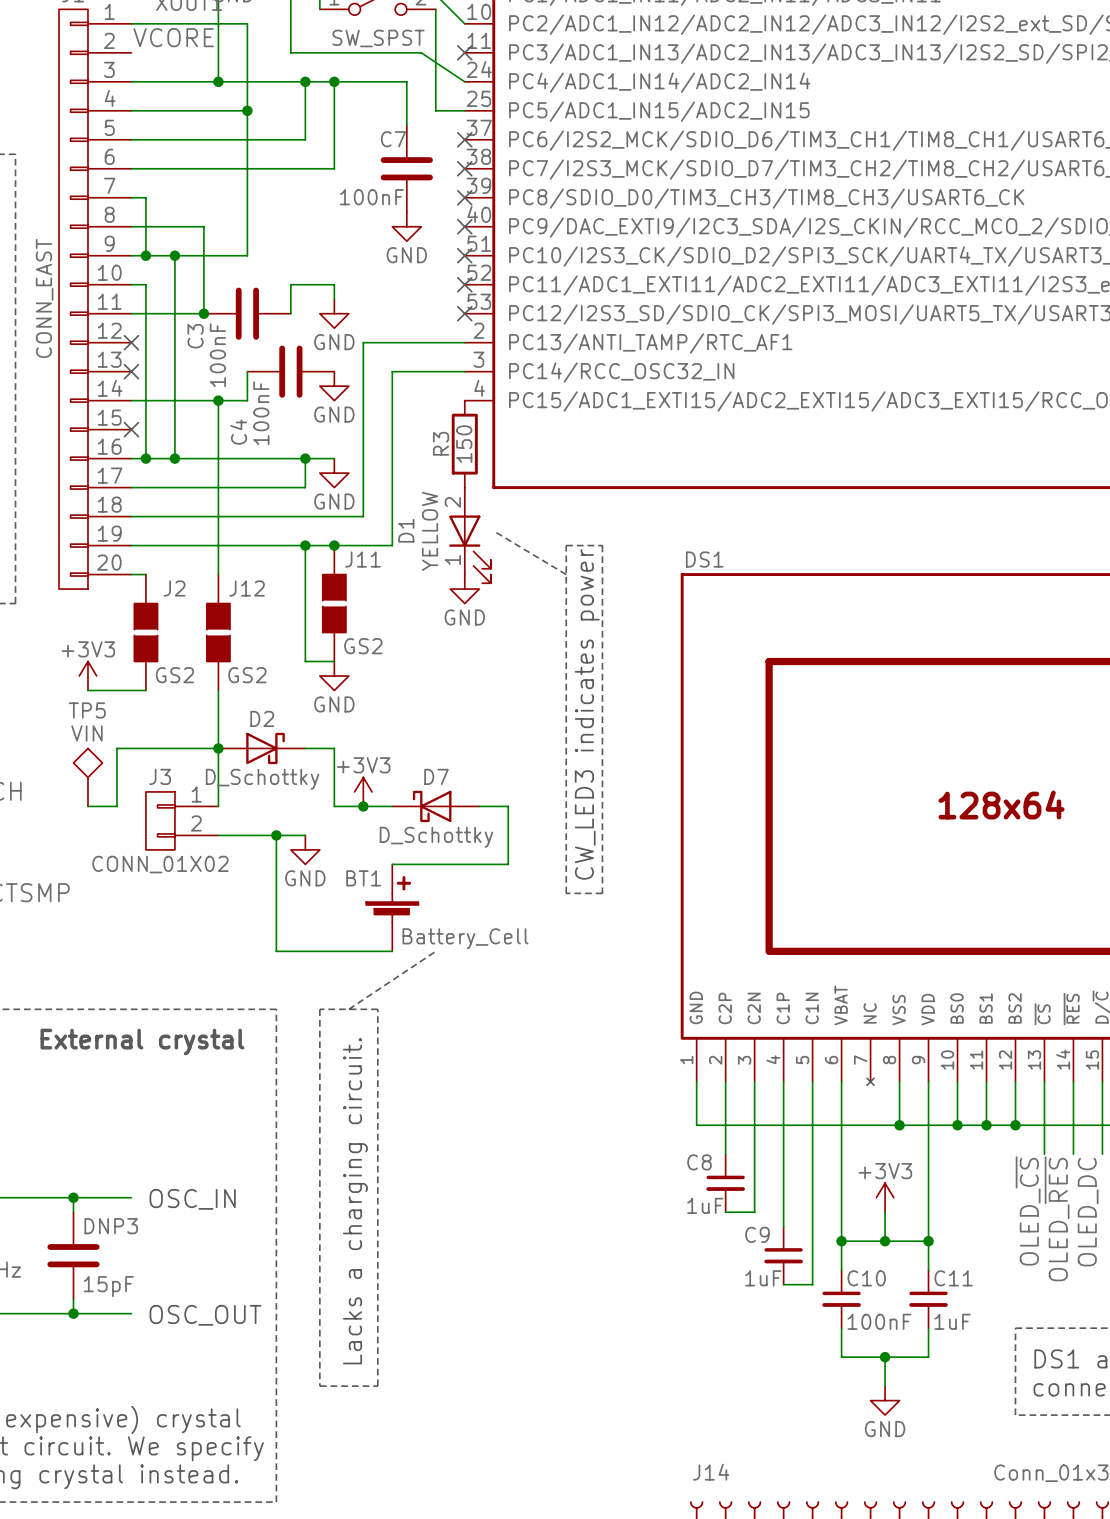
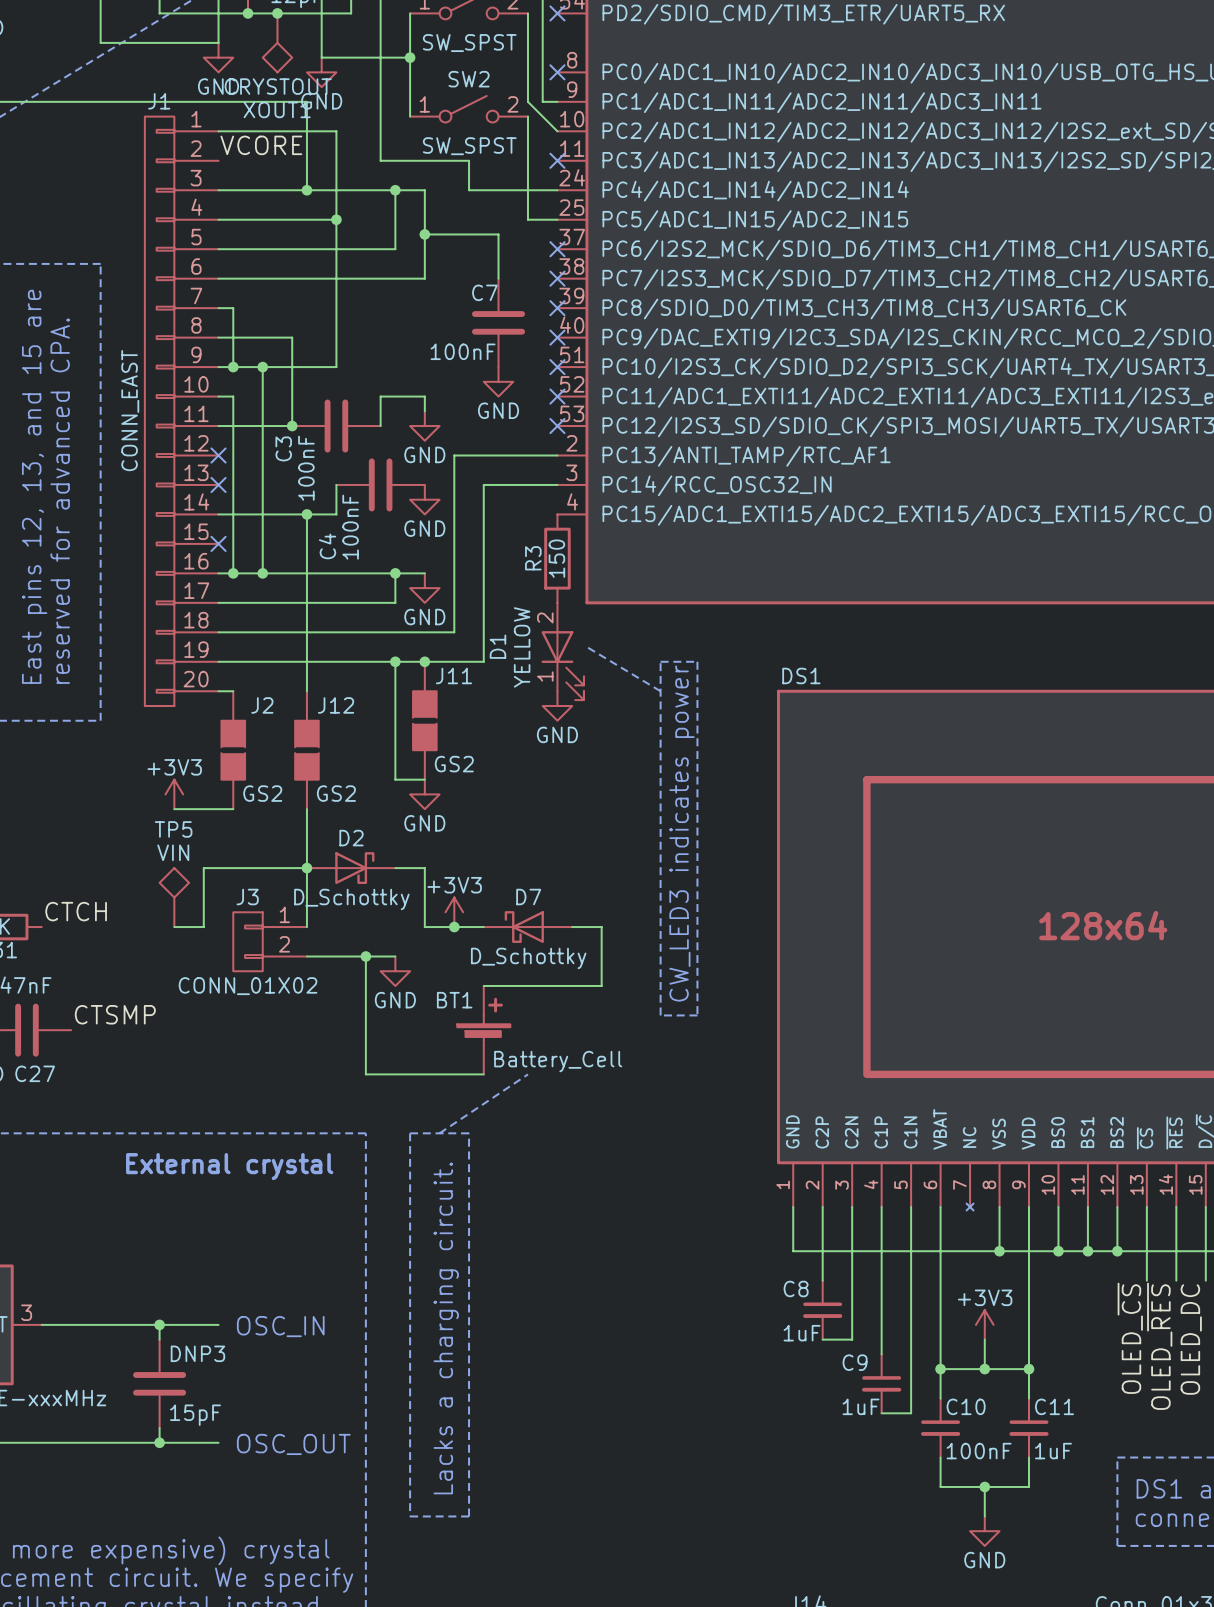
wire: (377, 52) (421, 52) (464, 81) -> (498, 190) (557, 190)
wire: (334, 81) (377, 81) -> (469, 160) (469, 190)
junction position: (334, 81) -> (424, 234)
wire: (406, 81) (406, 125) -> none
wire: none -> (424, 234) (498, 234) (498, 278)
C7 position: (406, 168) -> (498, 322)
power symbol position: GND (406, 226) -> GND (498, 381)

